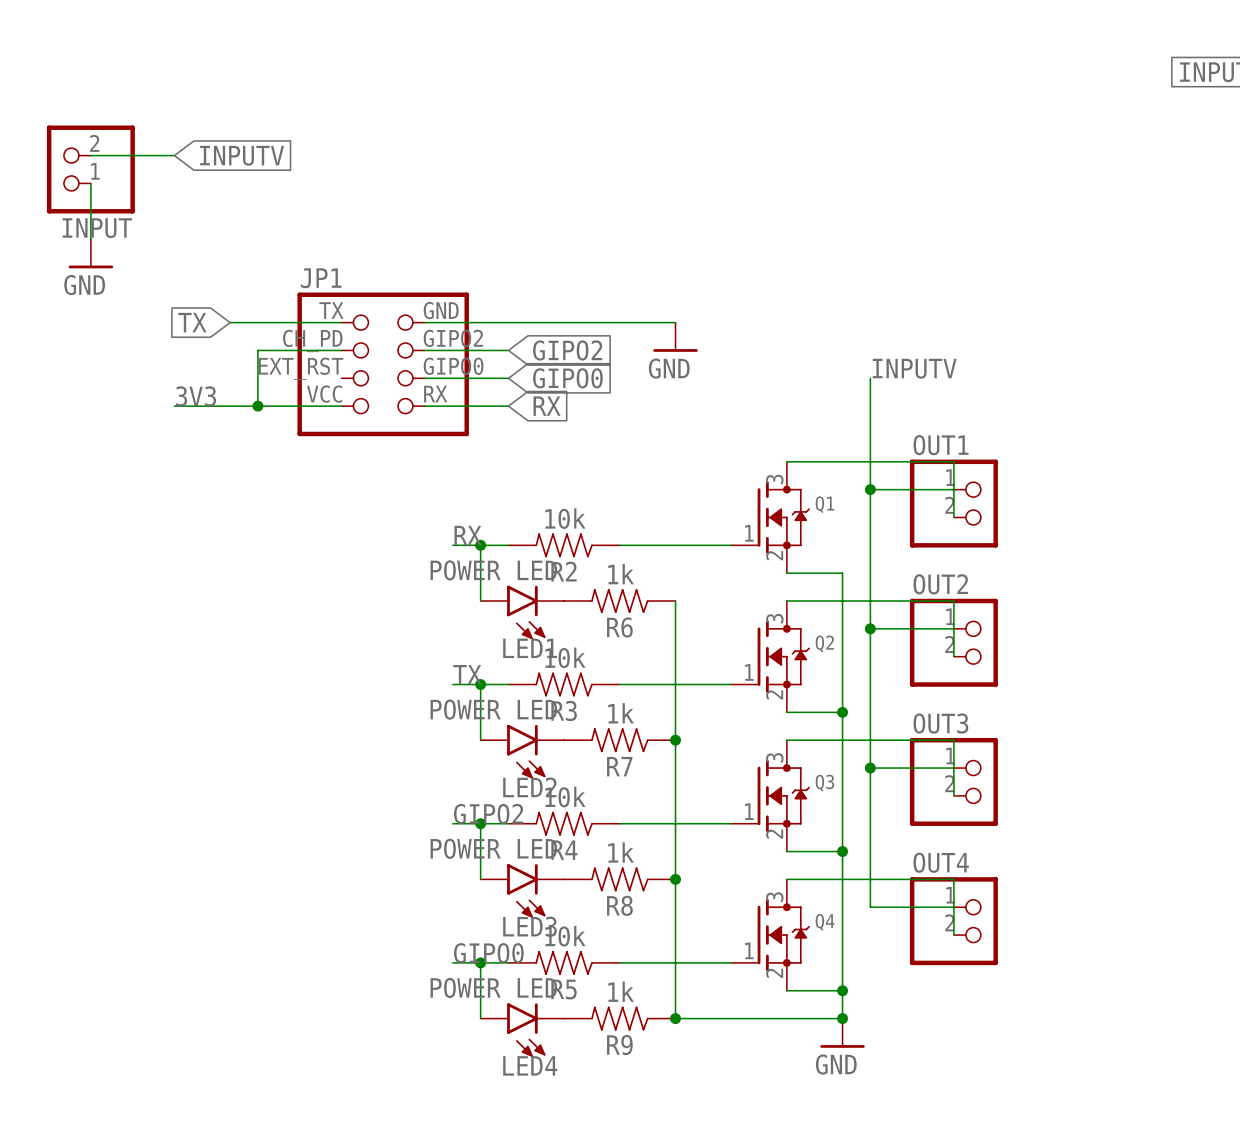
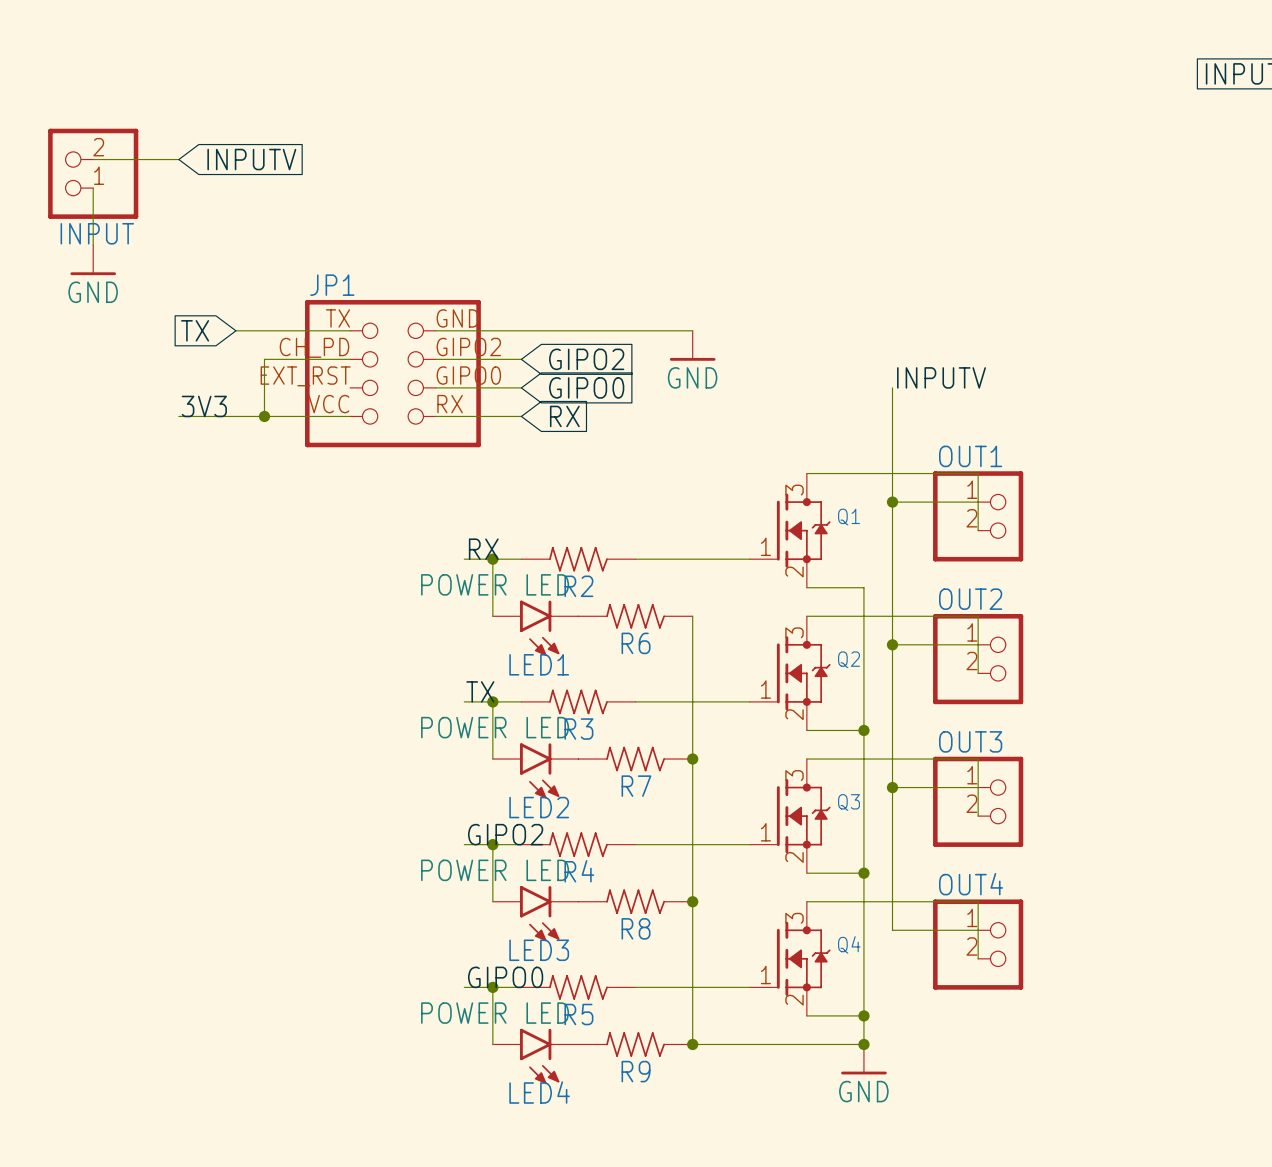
R2 value: 10k (565, 518) -> none
R6 value: 1k (621, 574) -> none
R3 value: 10k (565, 657) -> none
R7 value: 1k (621, 713) -> none
R4 value: 10k (565, 797) -> none
R8 value: 1k (621, 852) -> none
R5 value: 10k (565, 936) -> none
R9 value: 1k (621, 991) -> none

